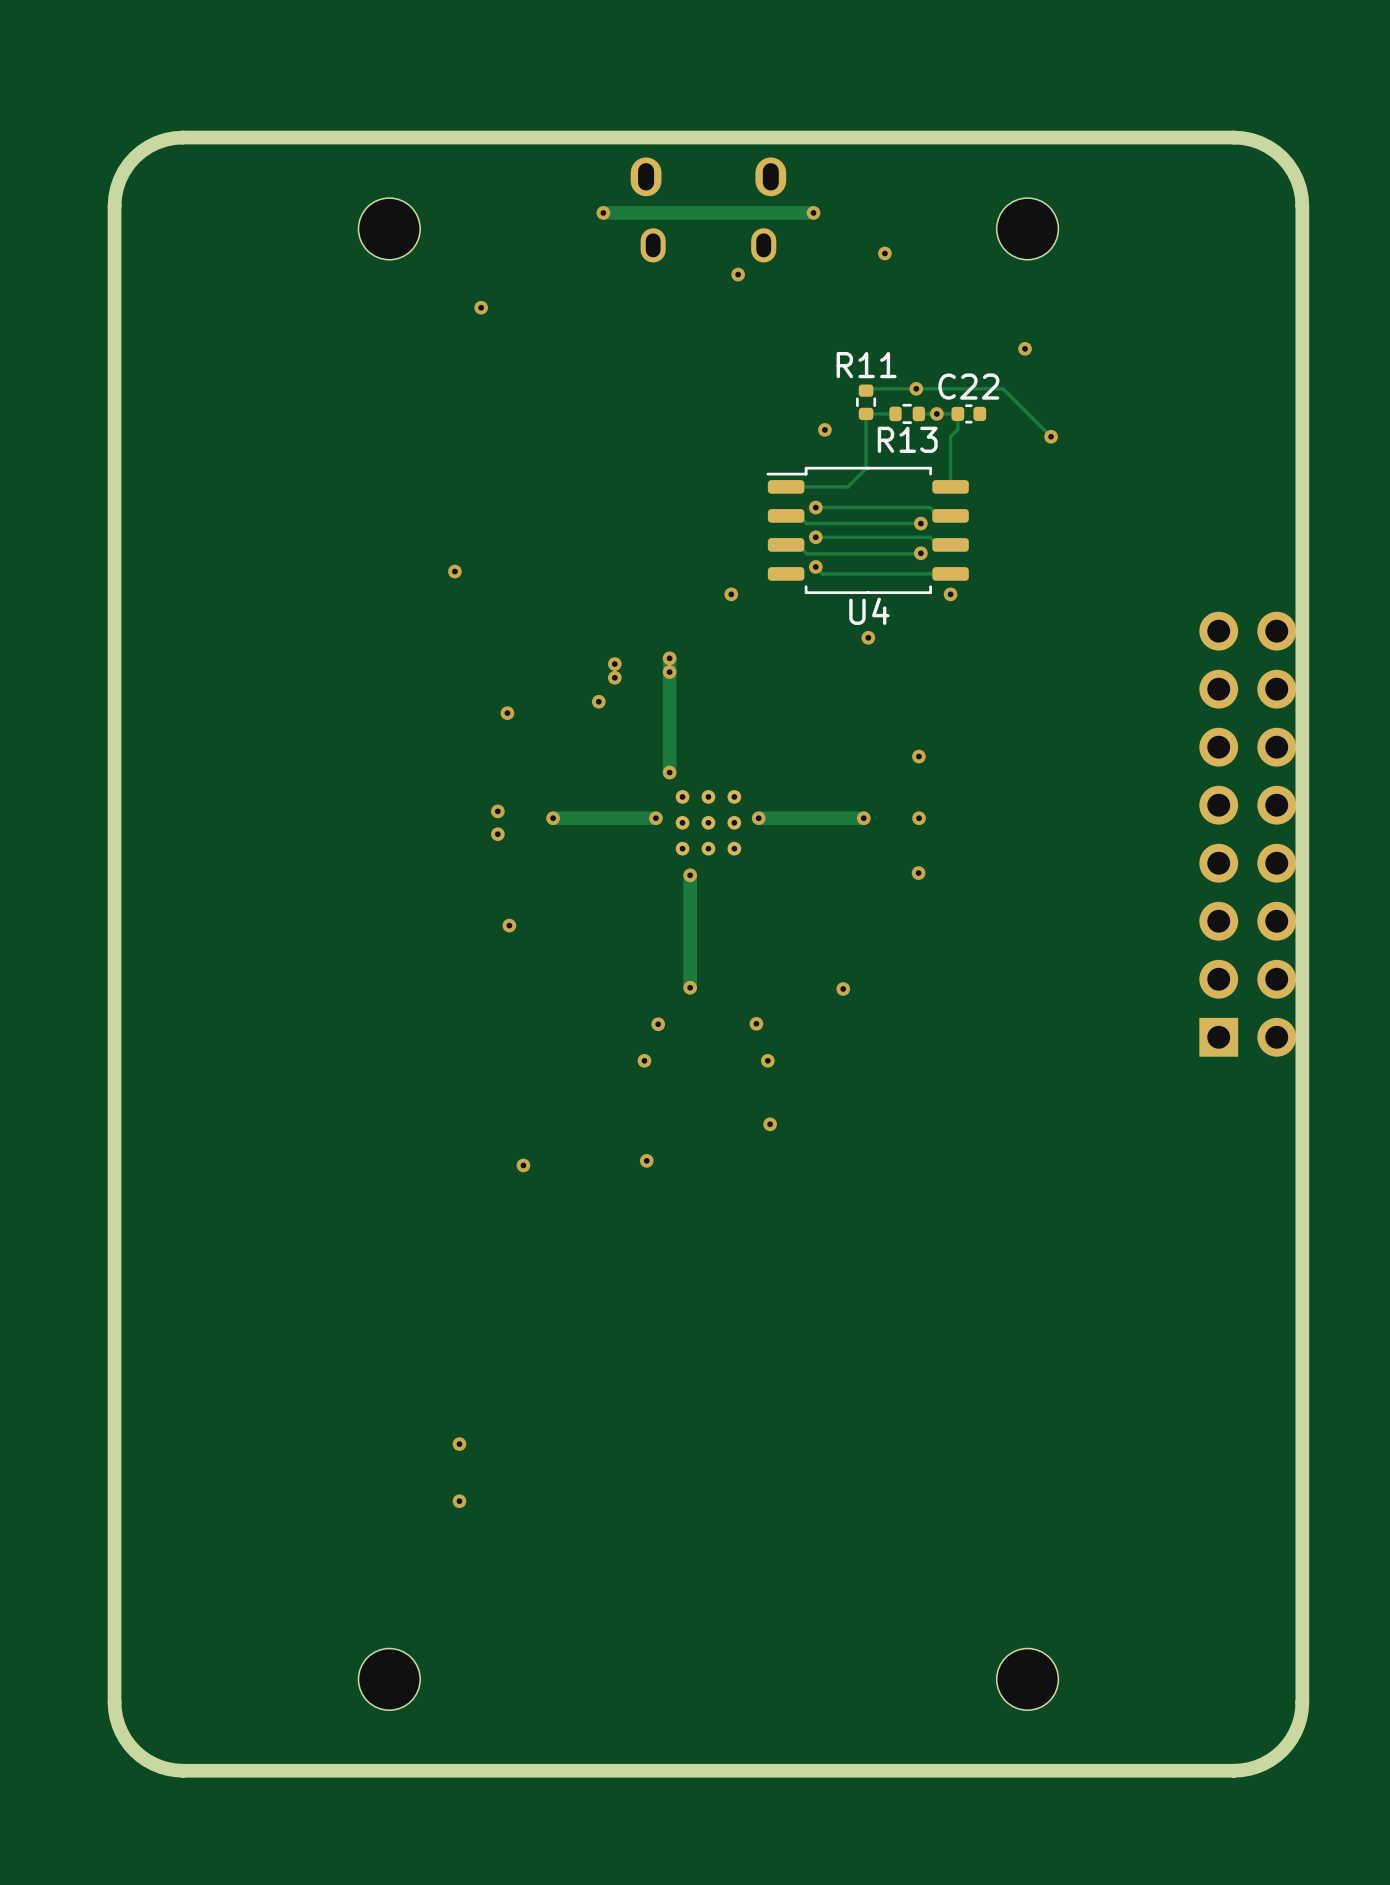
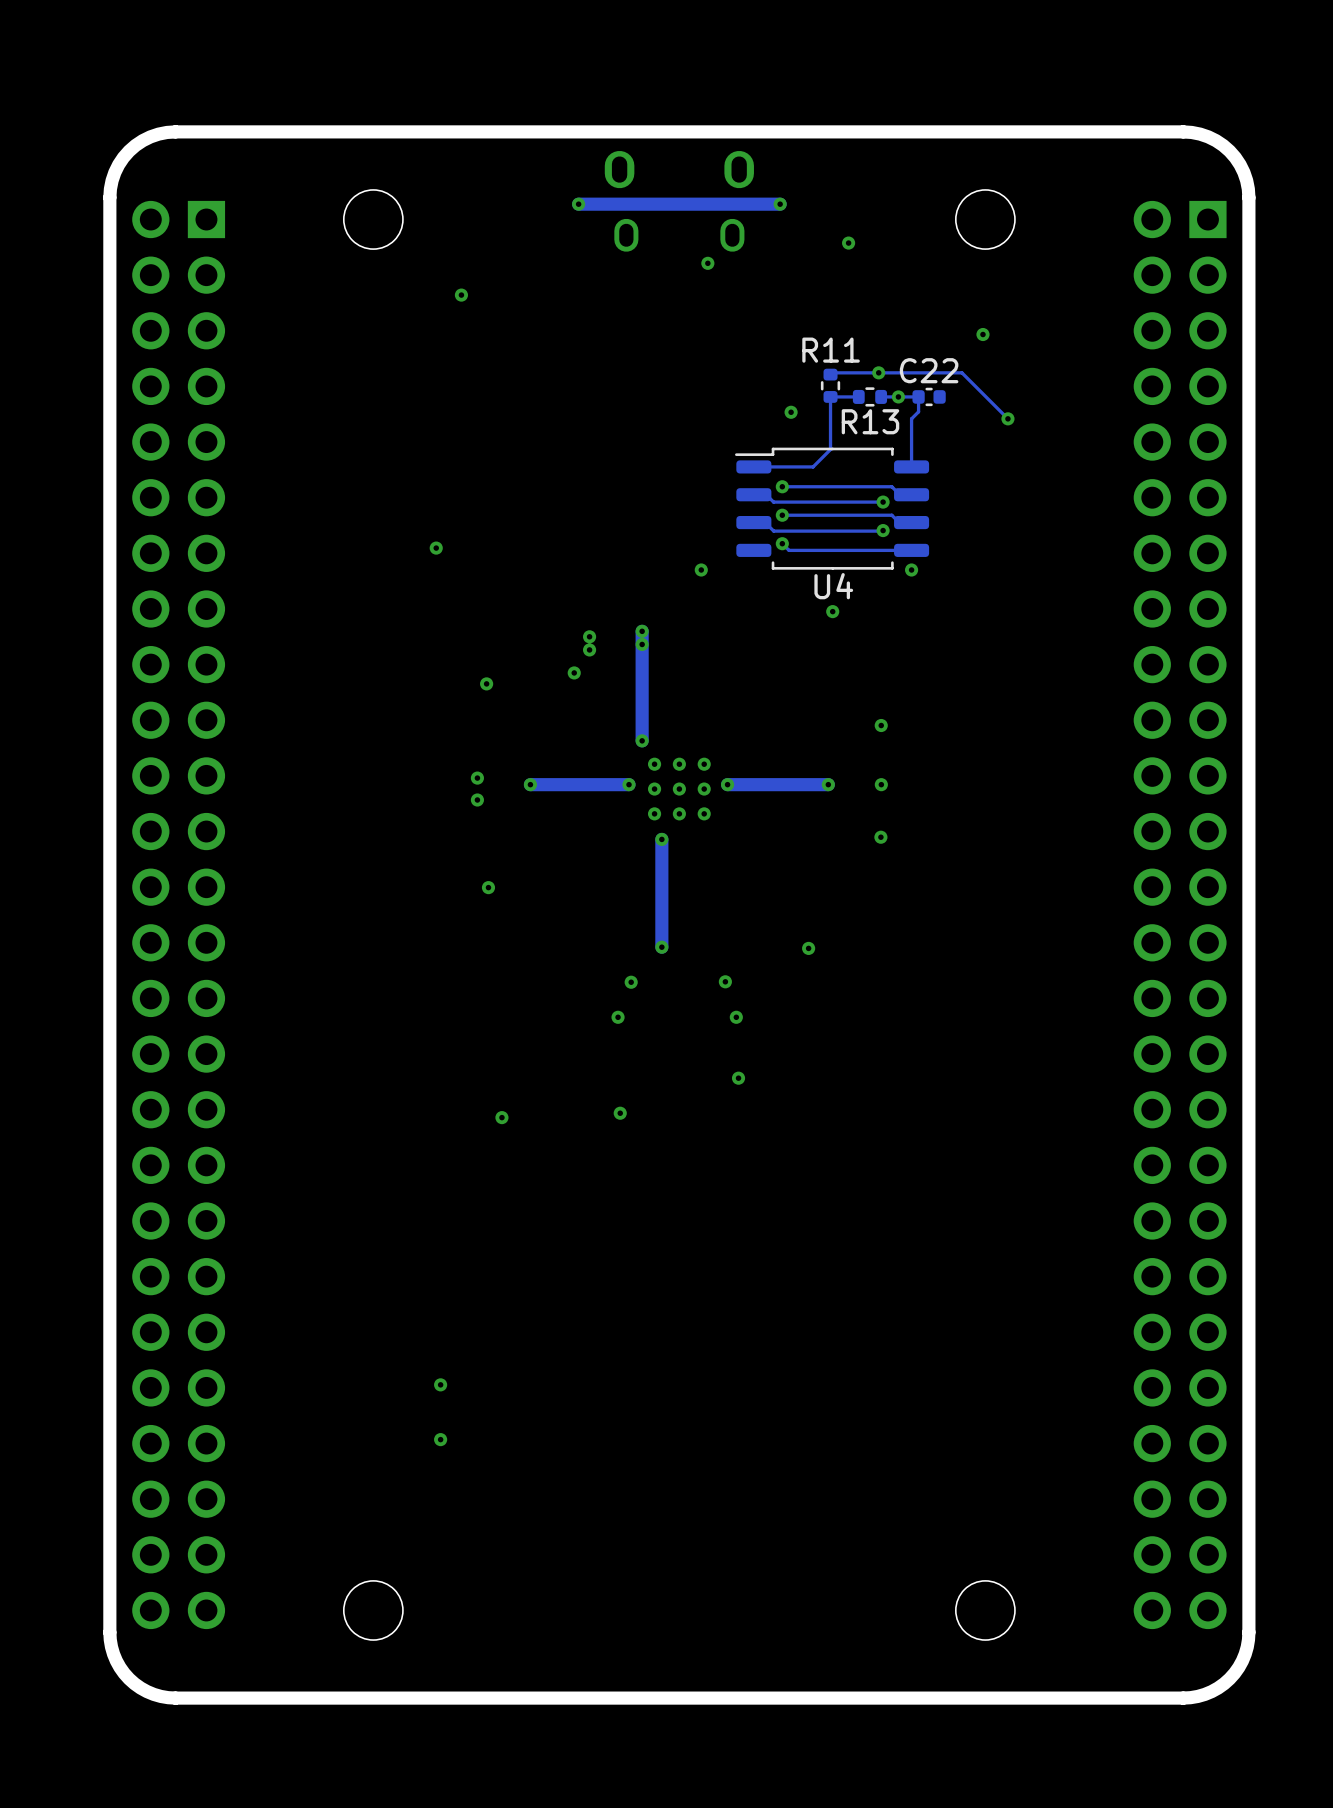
part: (1247, 834) -> none
part: none -> (178, 914)
part: none -> (1180, 914)

